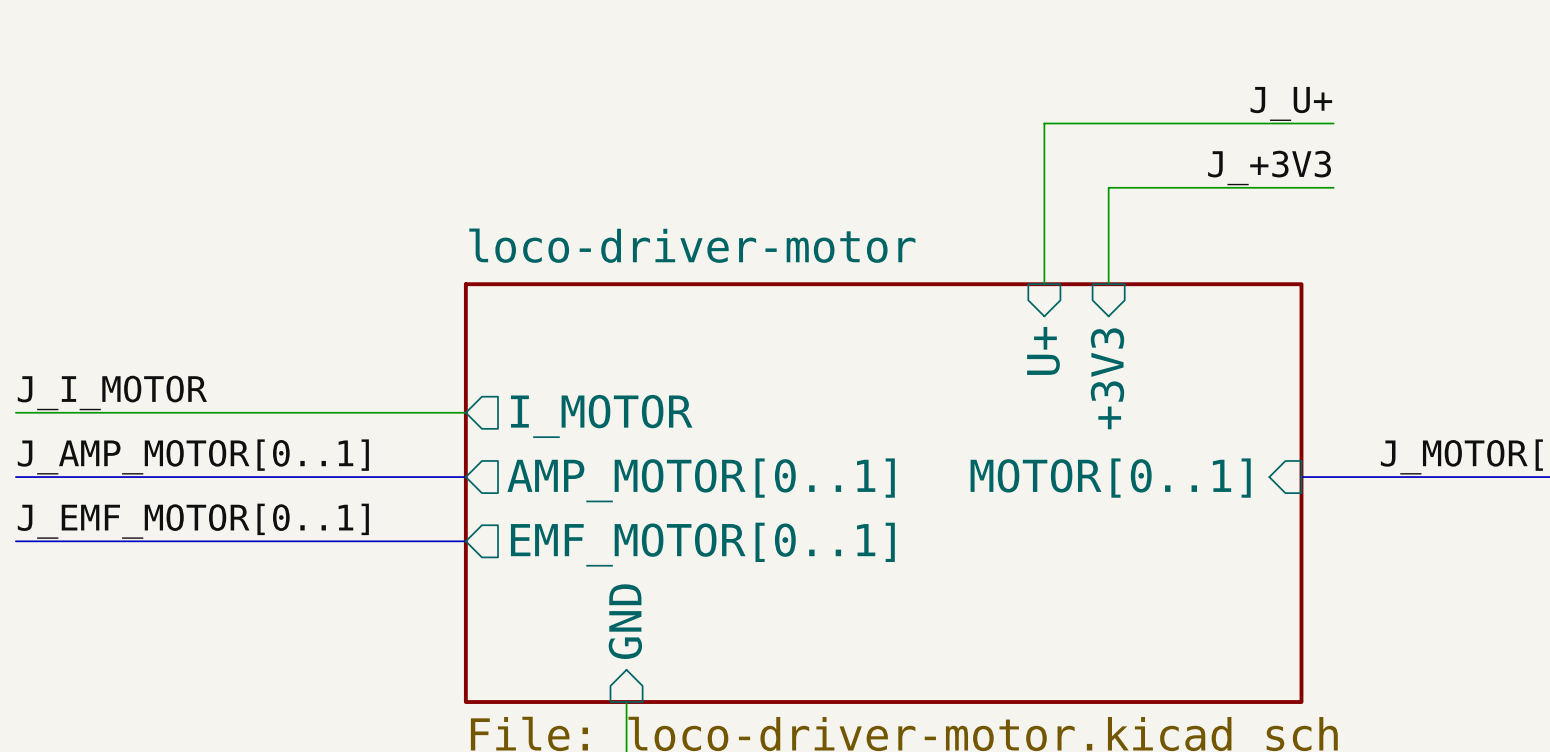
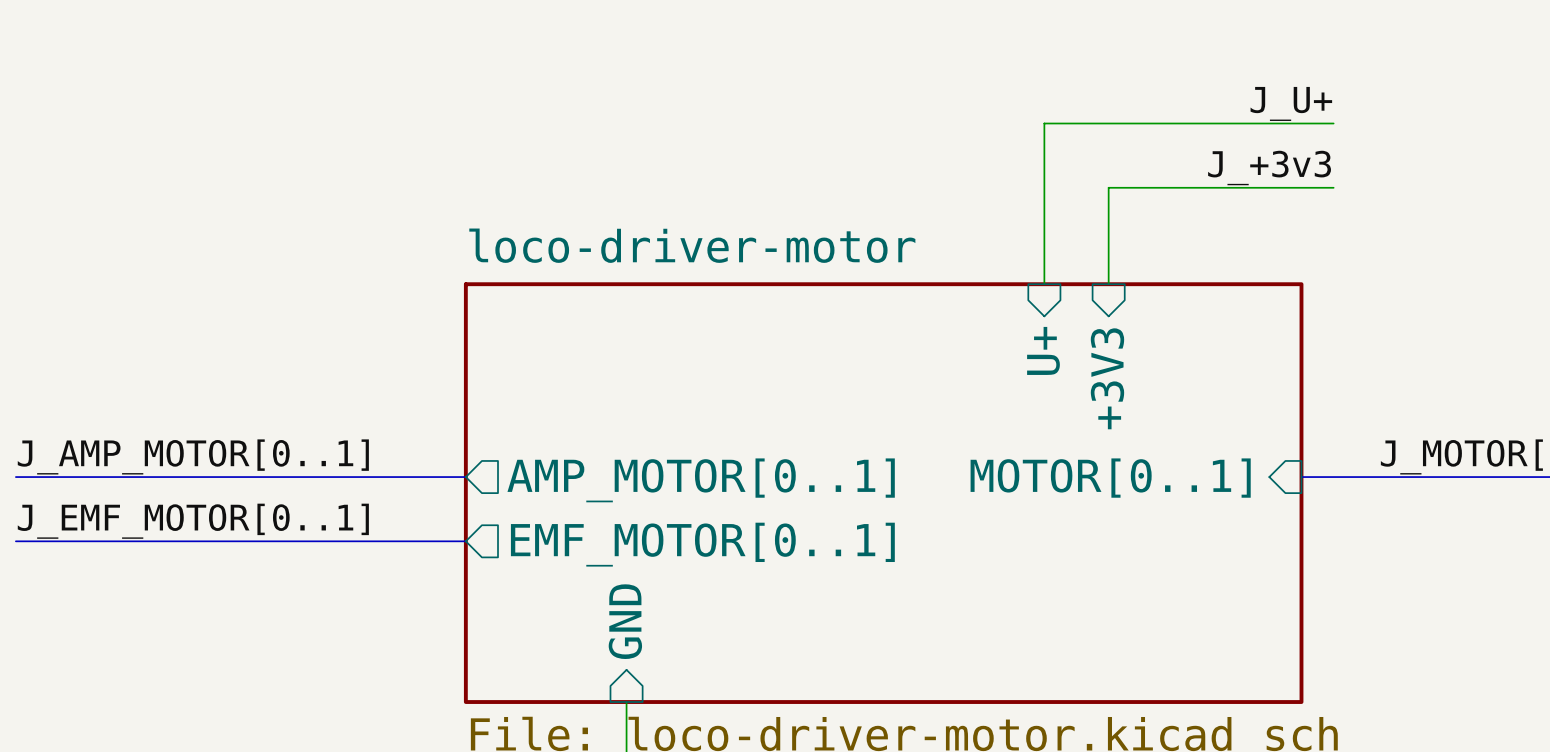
label: J_+3V3 (1269, 167) -> J_+3v3 (1269, 167)
label: J_I_MOTOR (112, 392) -> none
wire: (15, 412) (465, 412) -> none
sheet pin: I_MOTOR (601, 416) -> none

